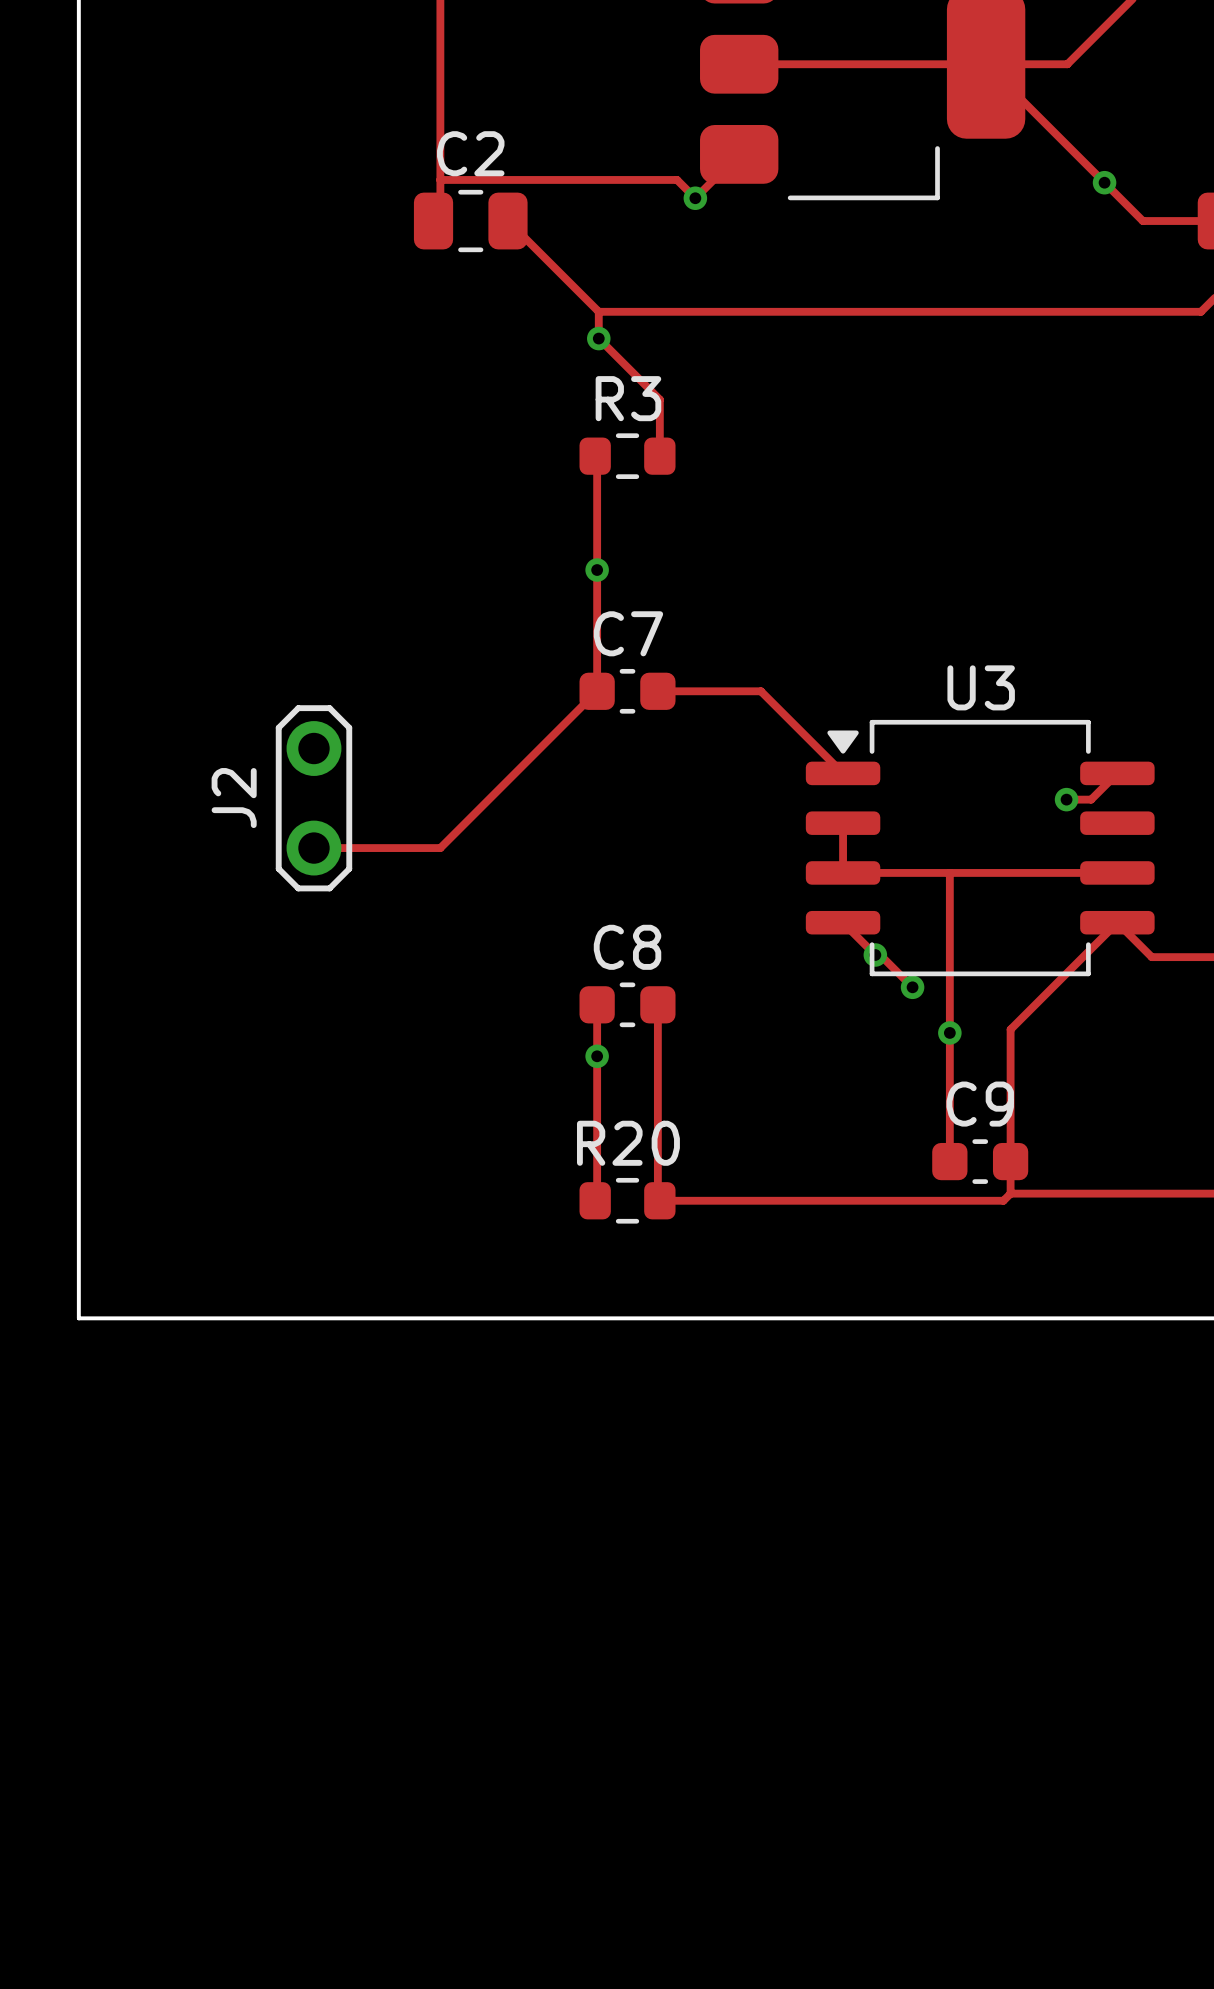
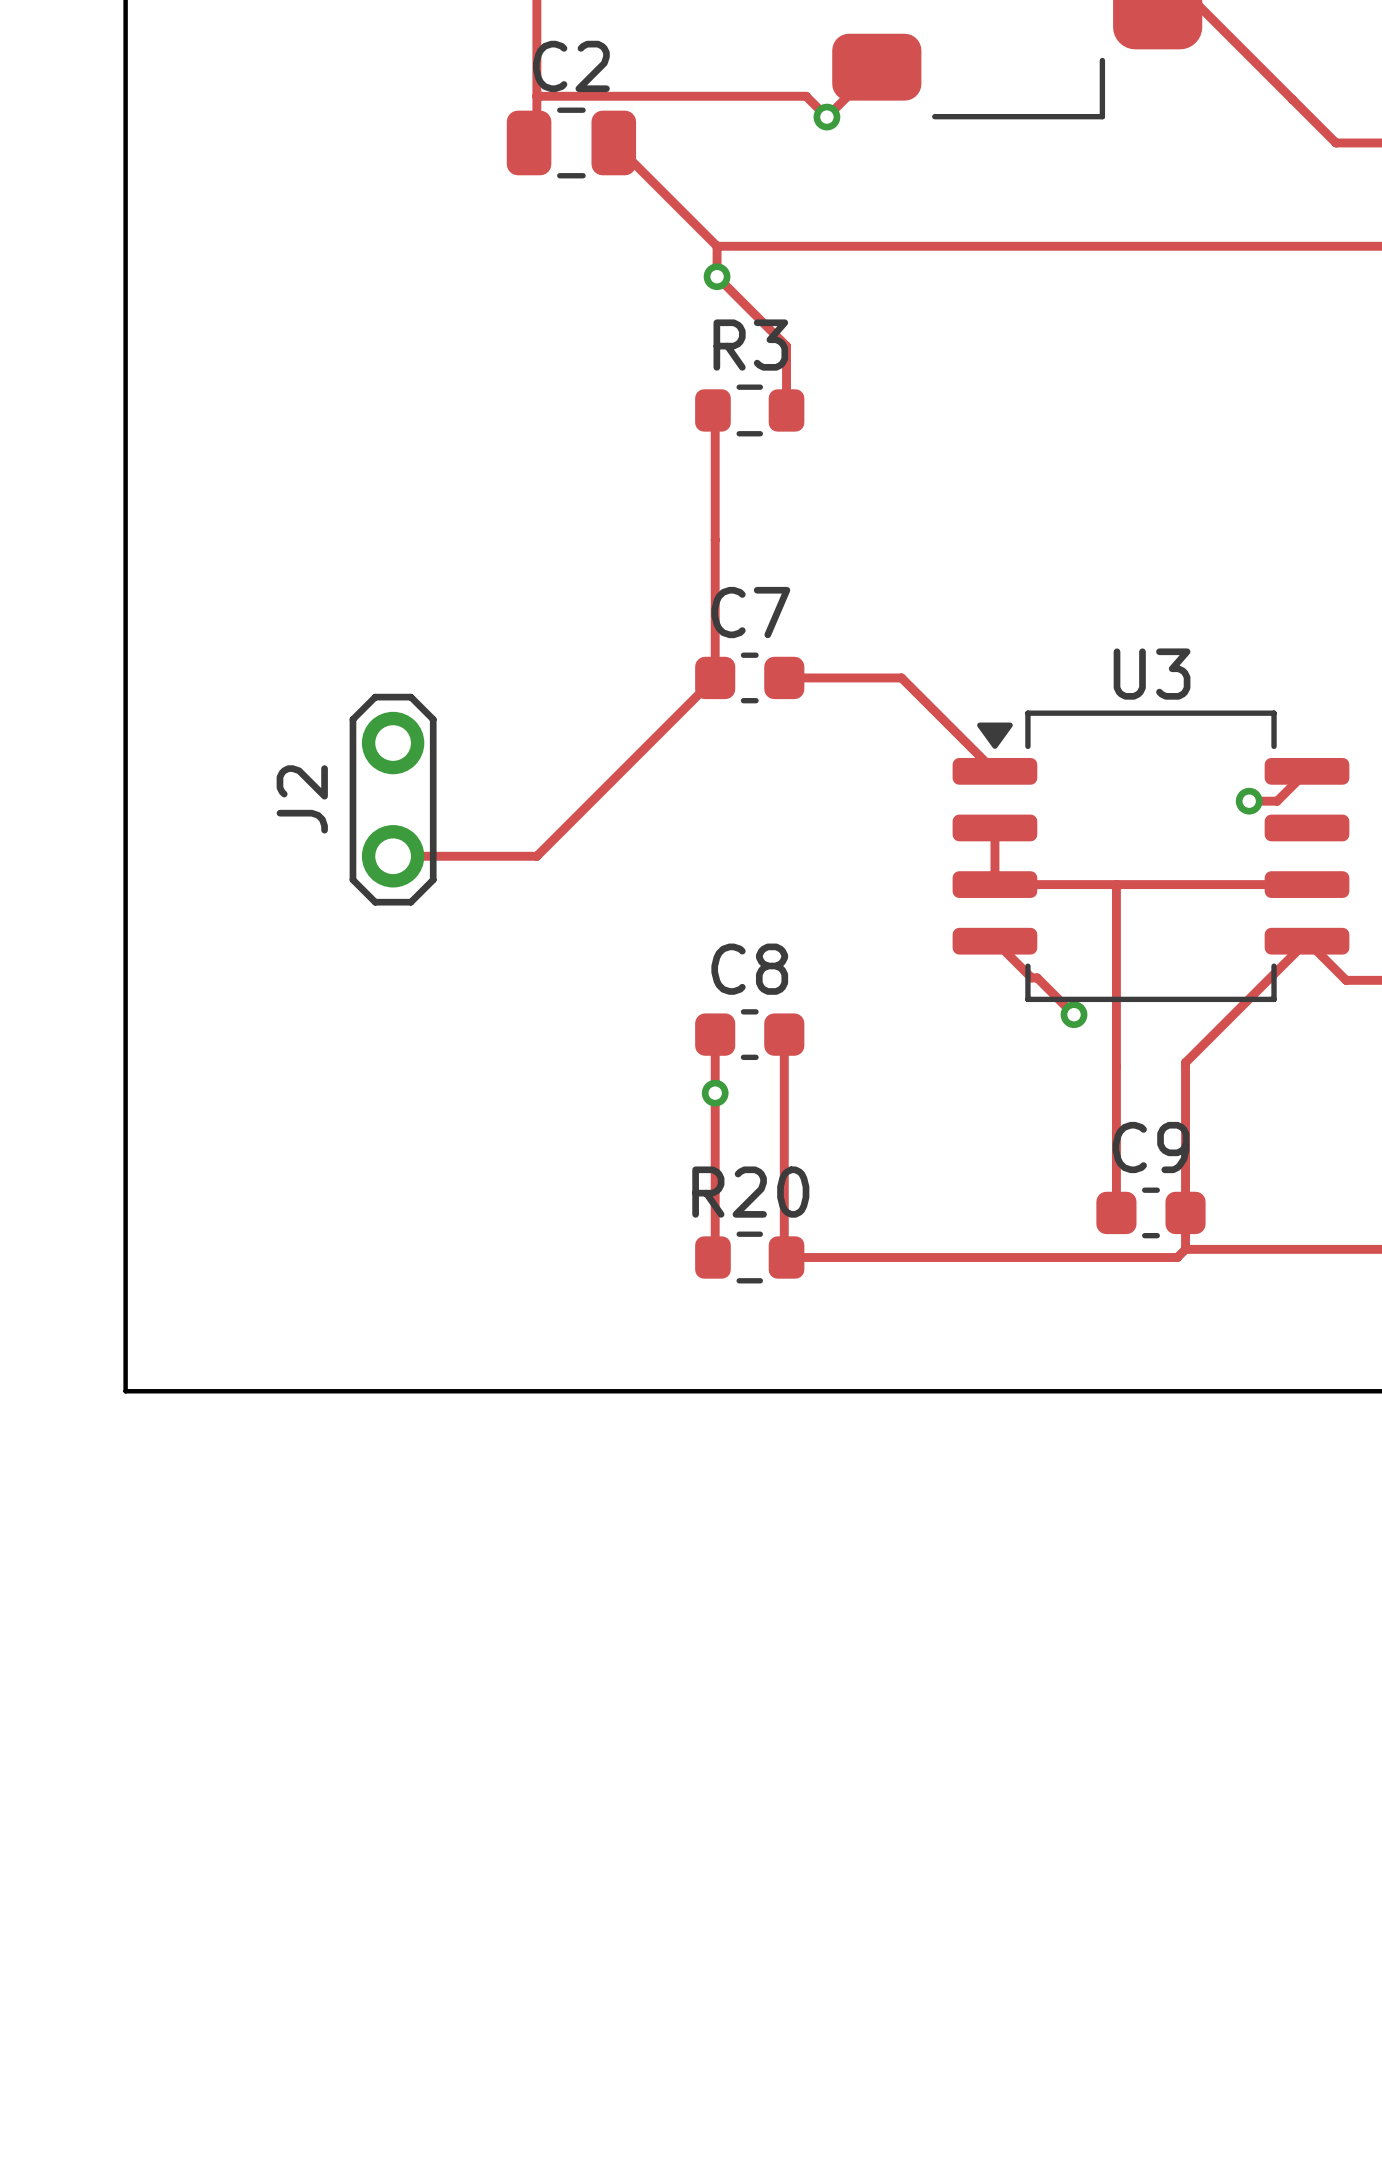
via: (1104, 182) -> none
via: (597, 570) -> none
via: (875, 954) -> none
via: (949, 1032) -> none

